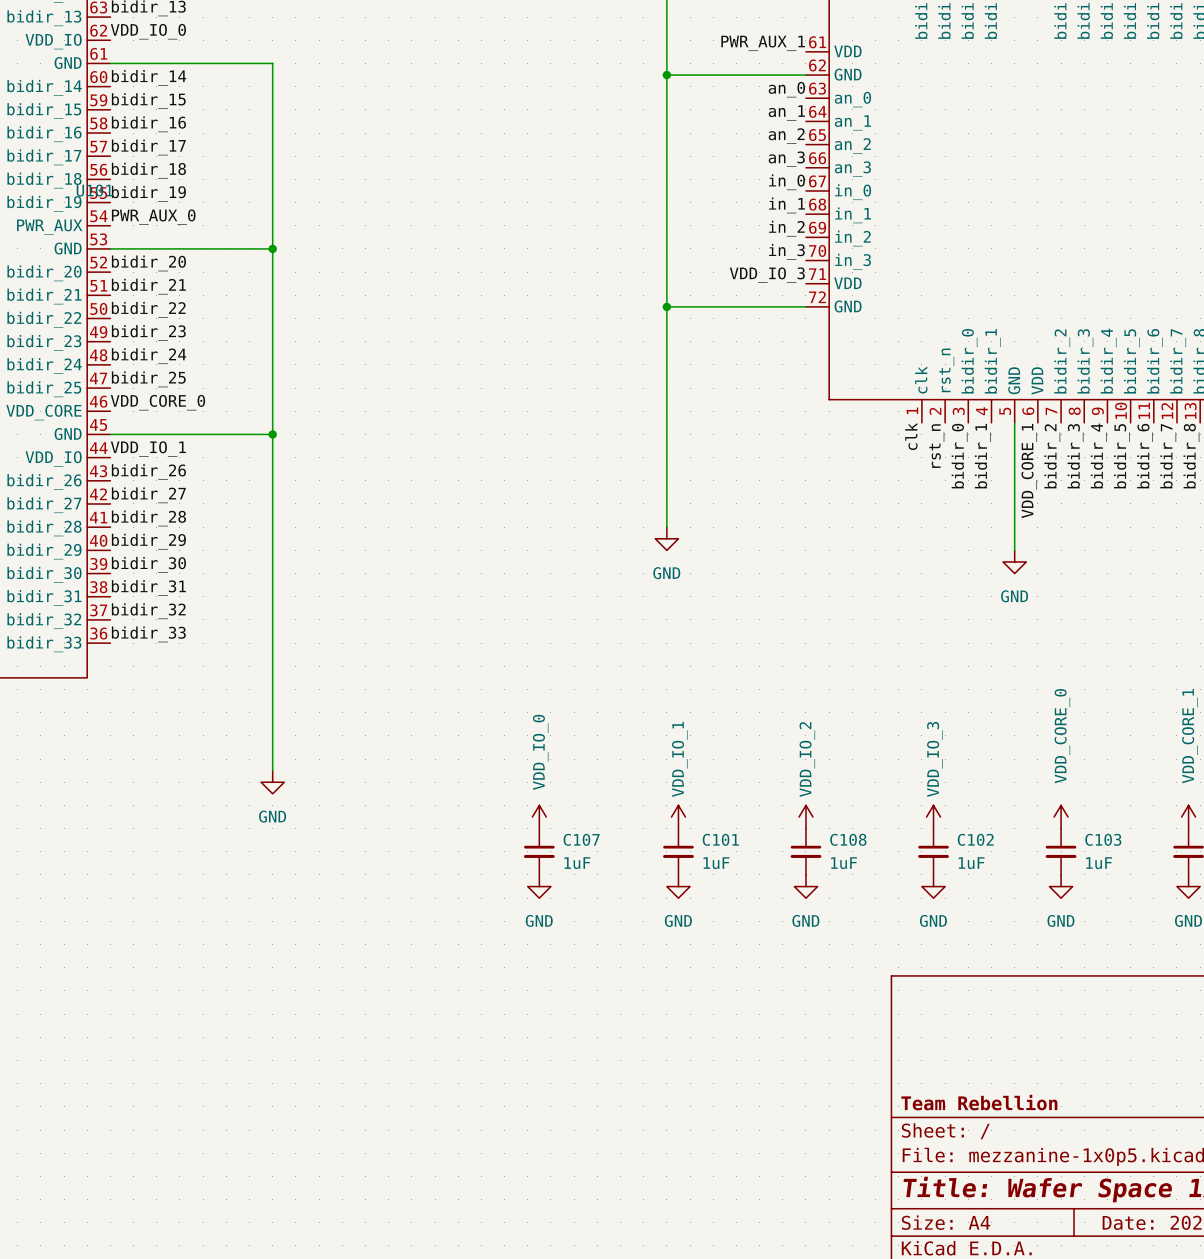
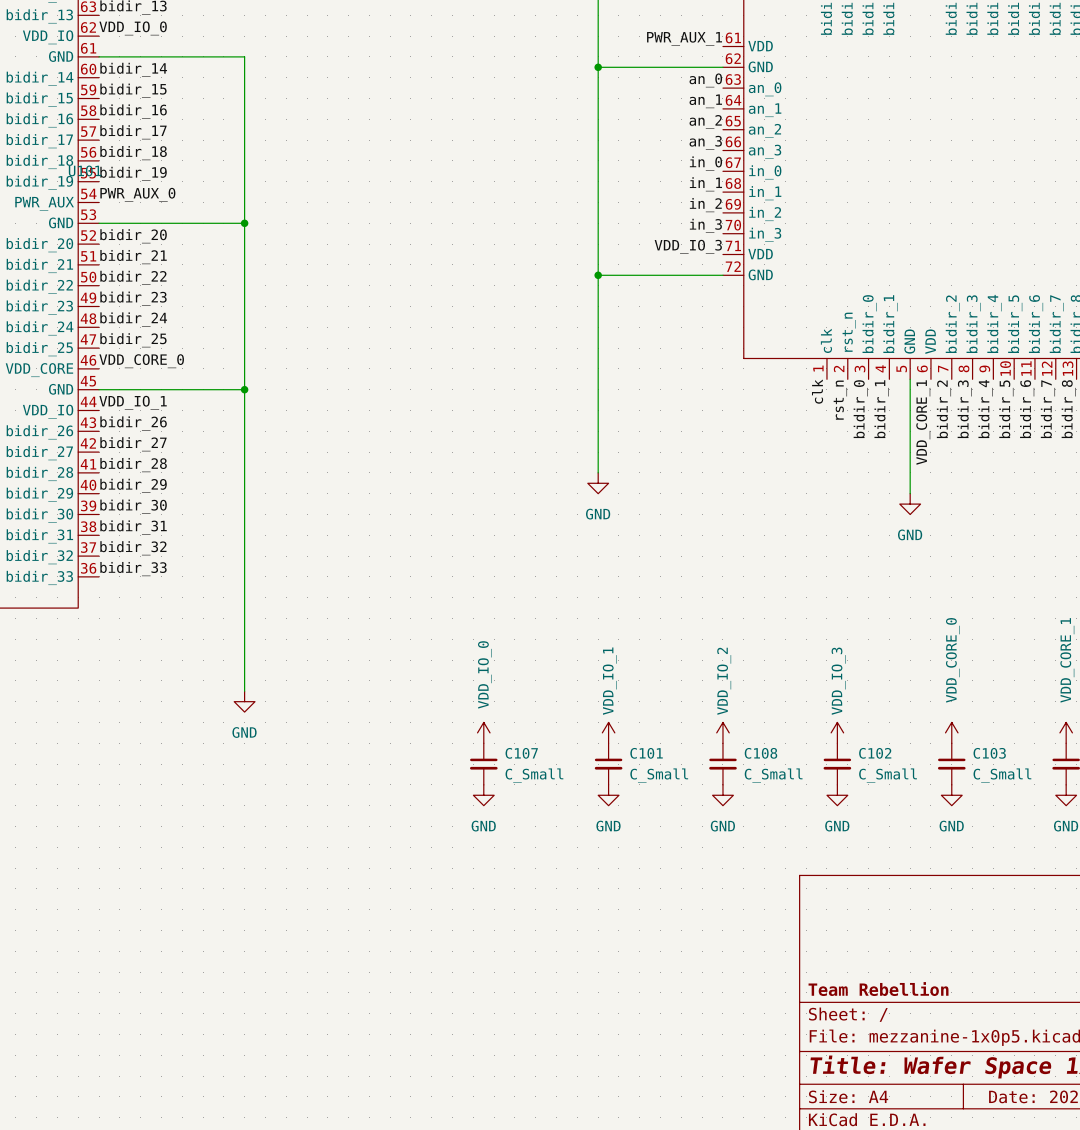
C107 value: 1uF (577, 863) -> C_Small (534, 775)
C101 value: 1uF (716, 863) -> C_Small (659, 775)
C108 value: 1uF (844, 863) -> C_Small (773, 775)
C102 value: 1uF (971, 863) -> C_Small (888, 775)
C103 value: 1uF (1099, 863) -> C_Small (1002, 775)

